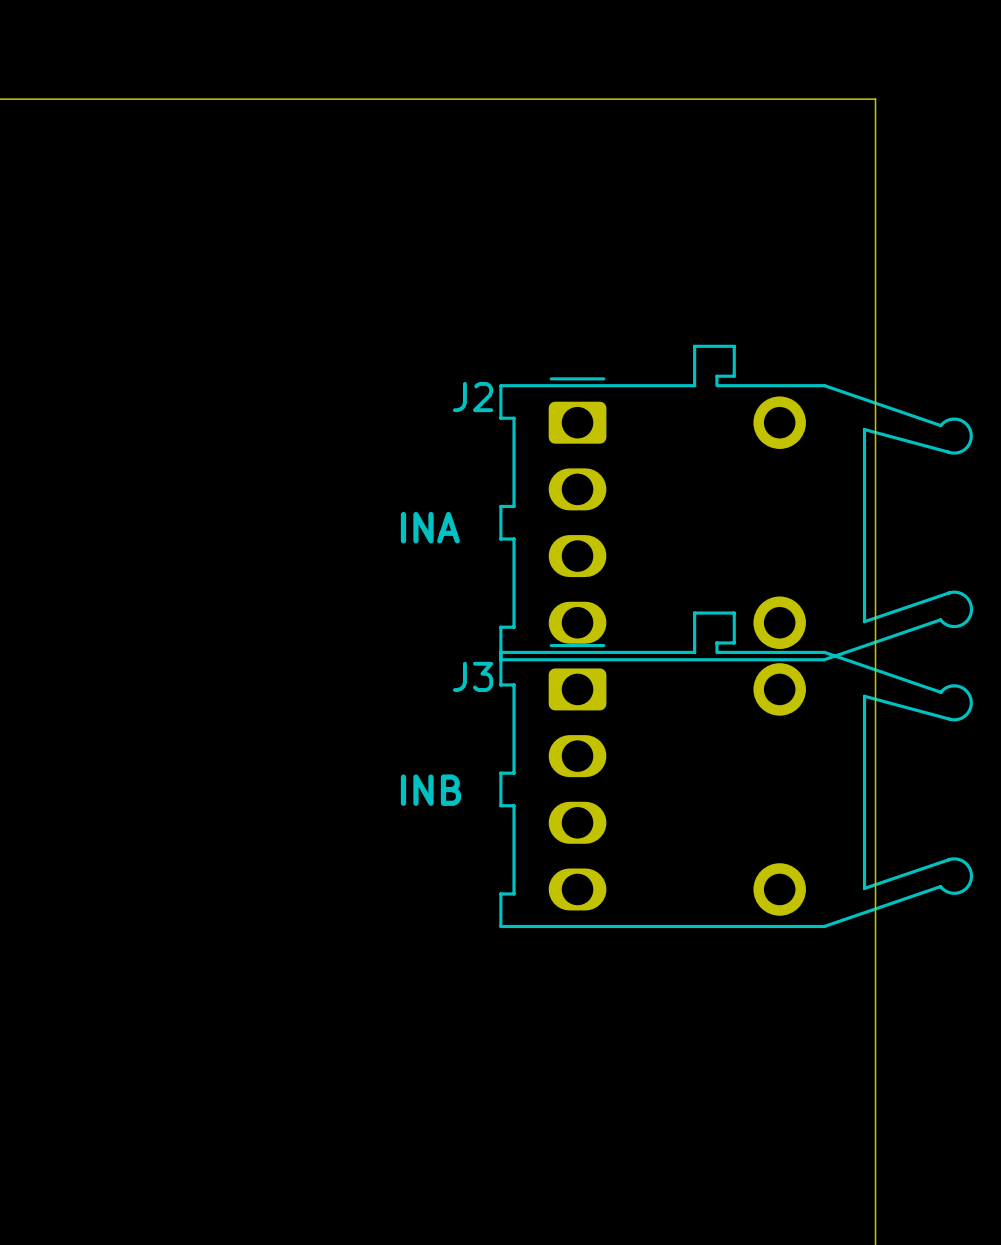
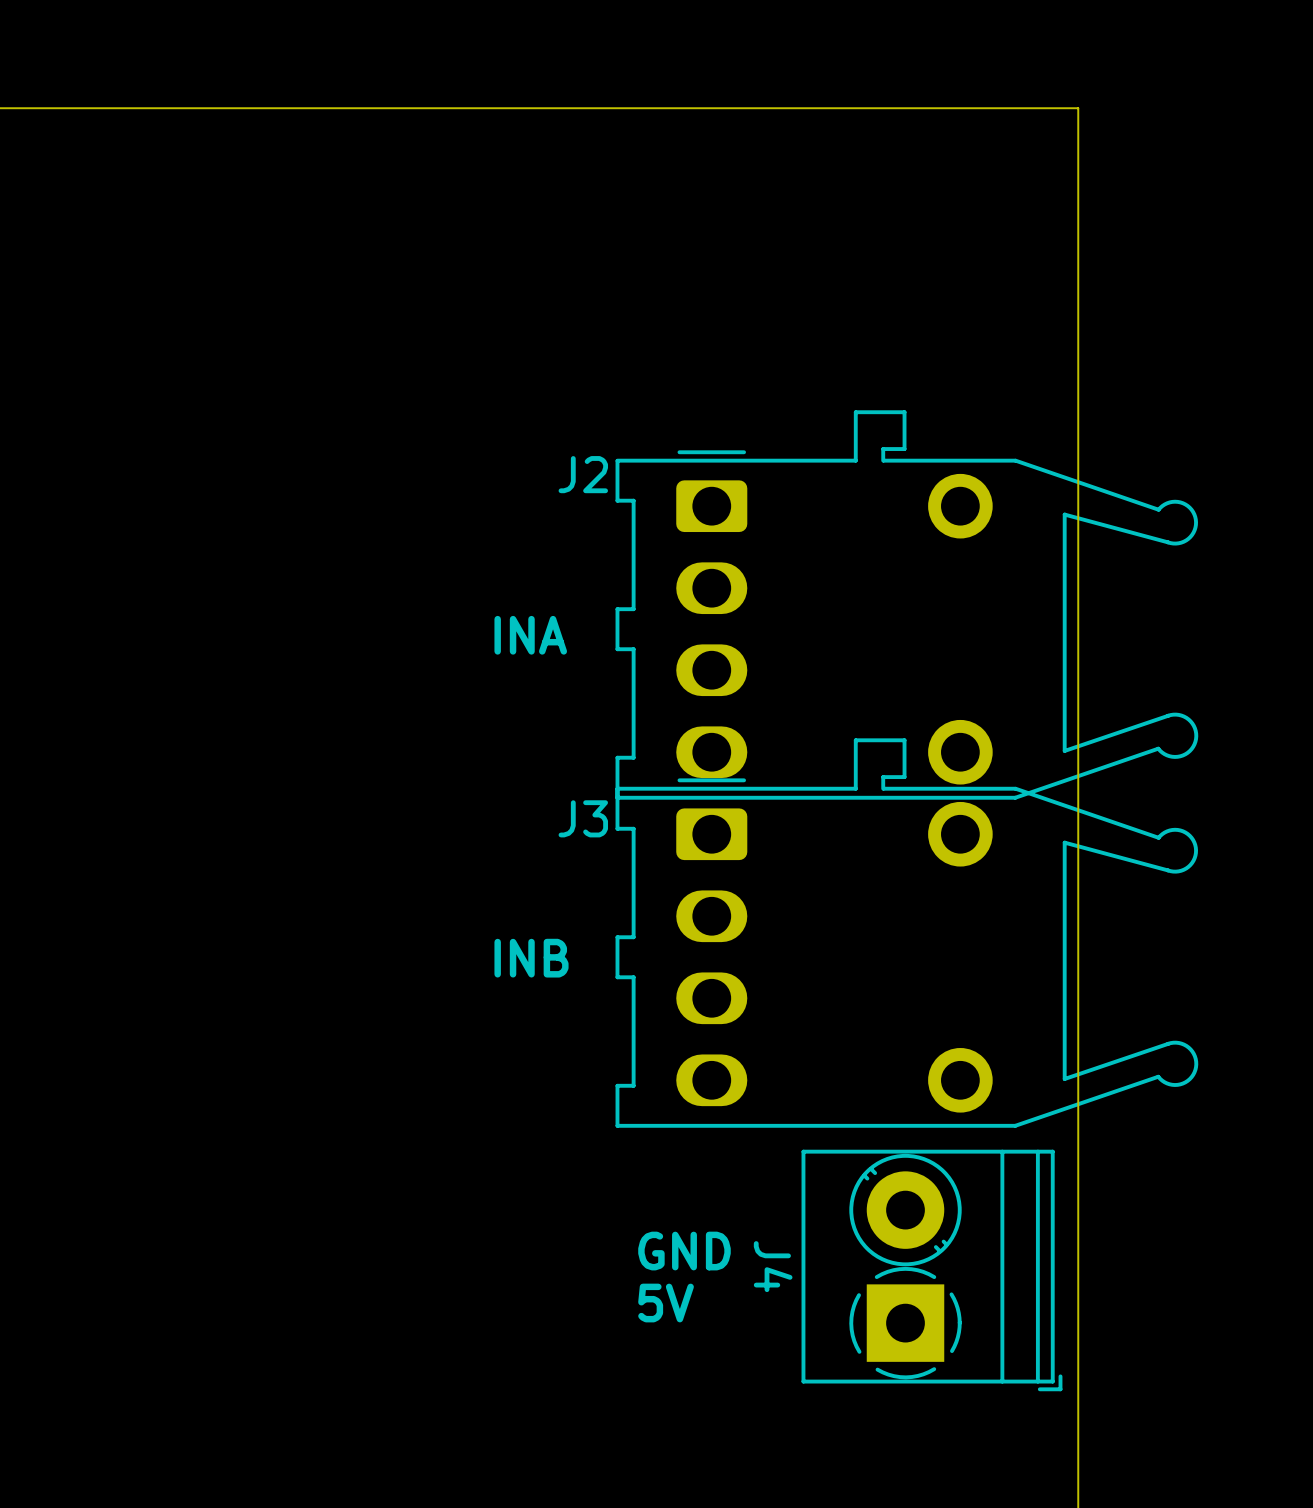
text: none -> GND (684, 1251)
J4: none -> (931, 1270)
text: none -> 5V (666, 1303)

